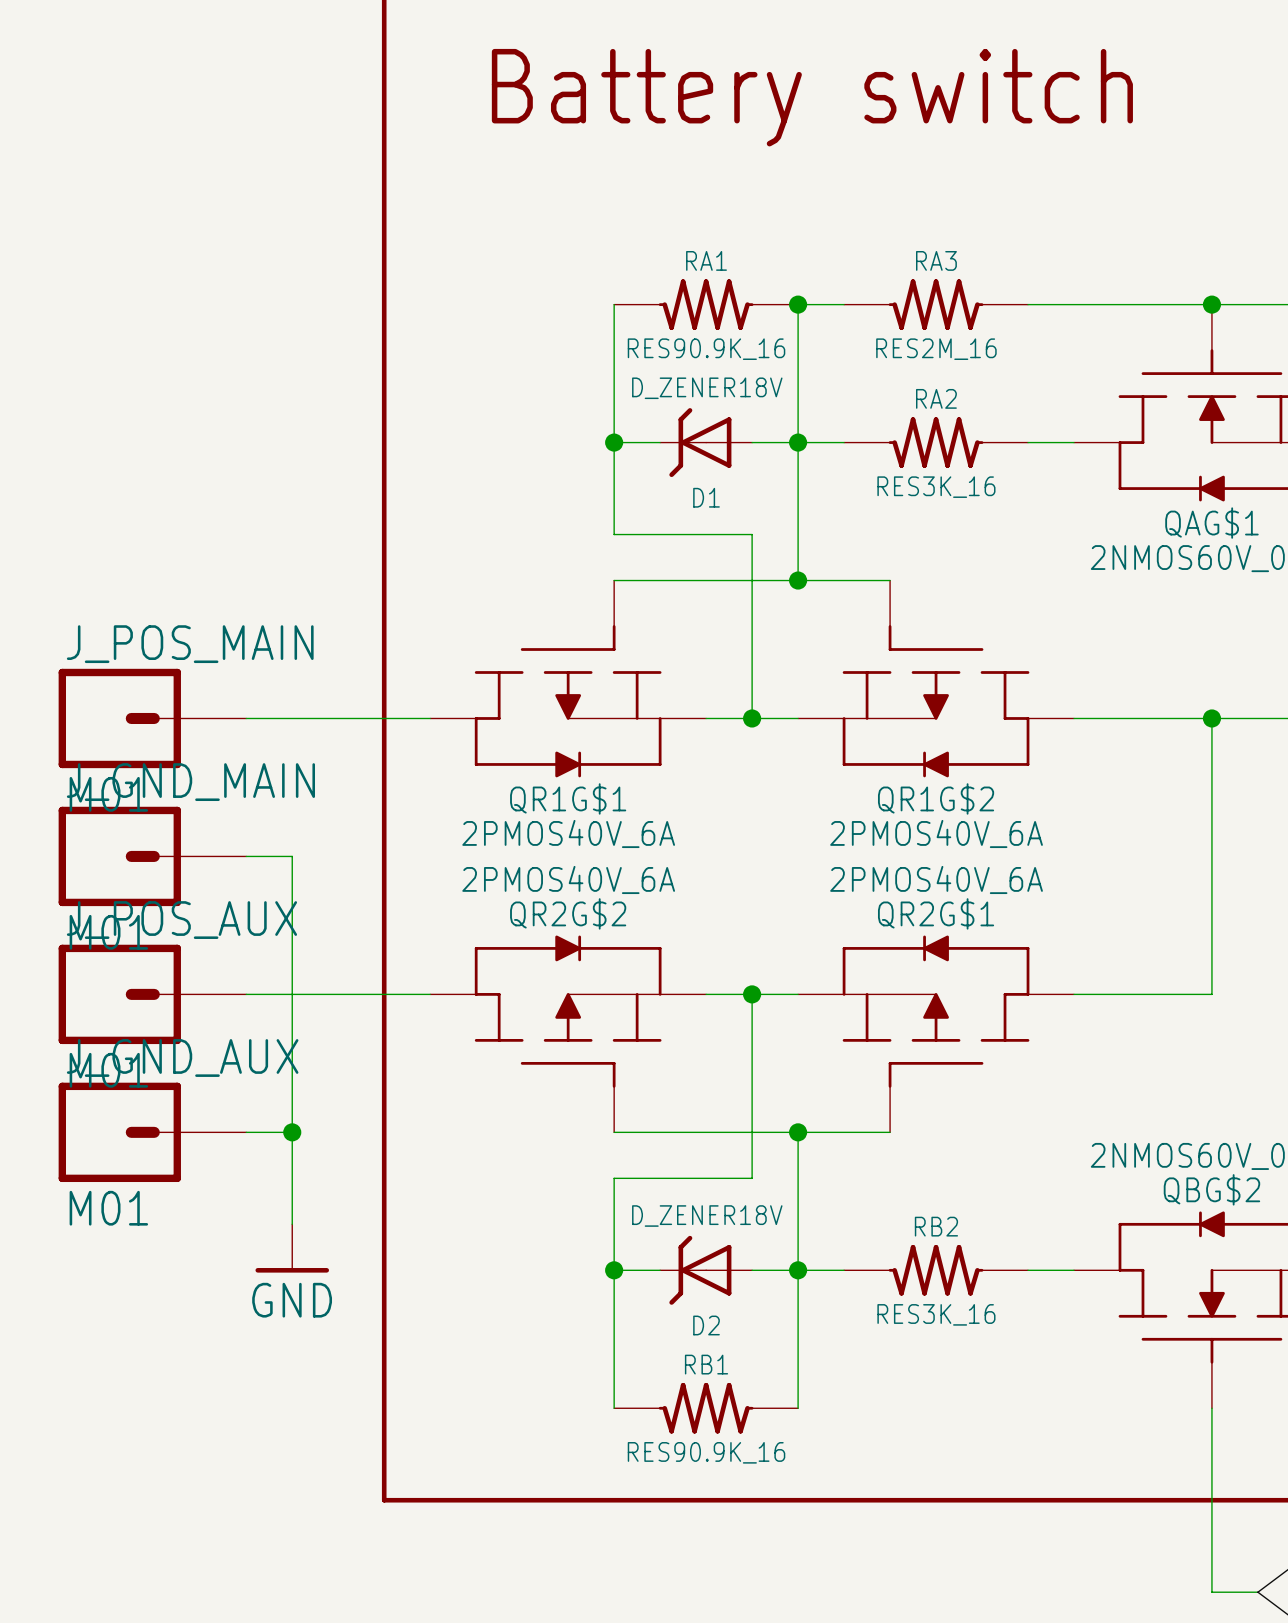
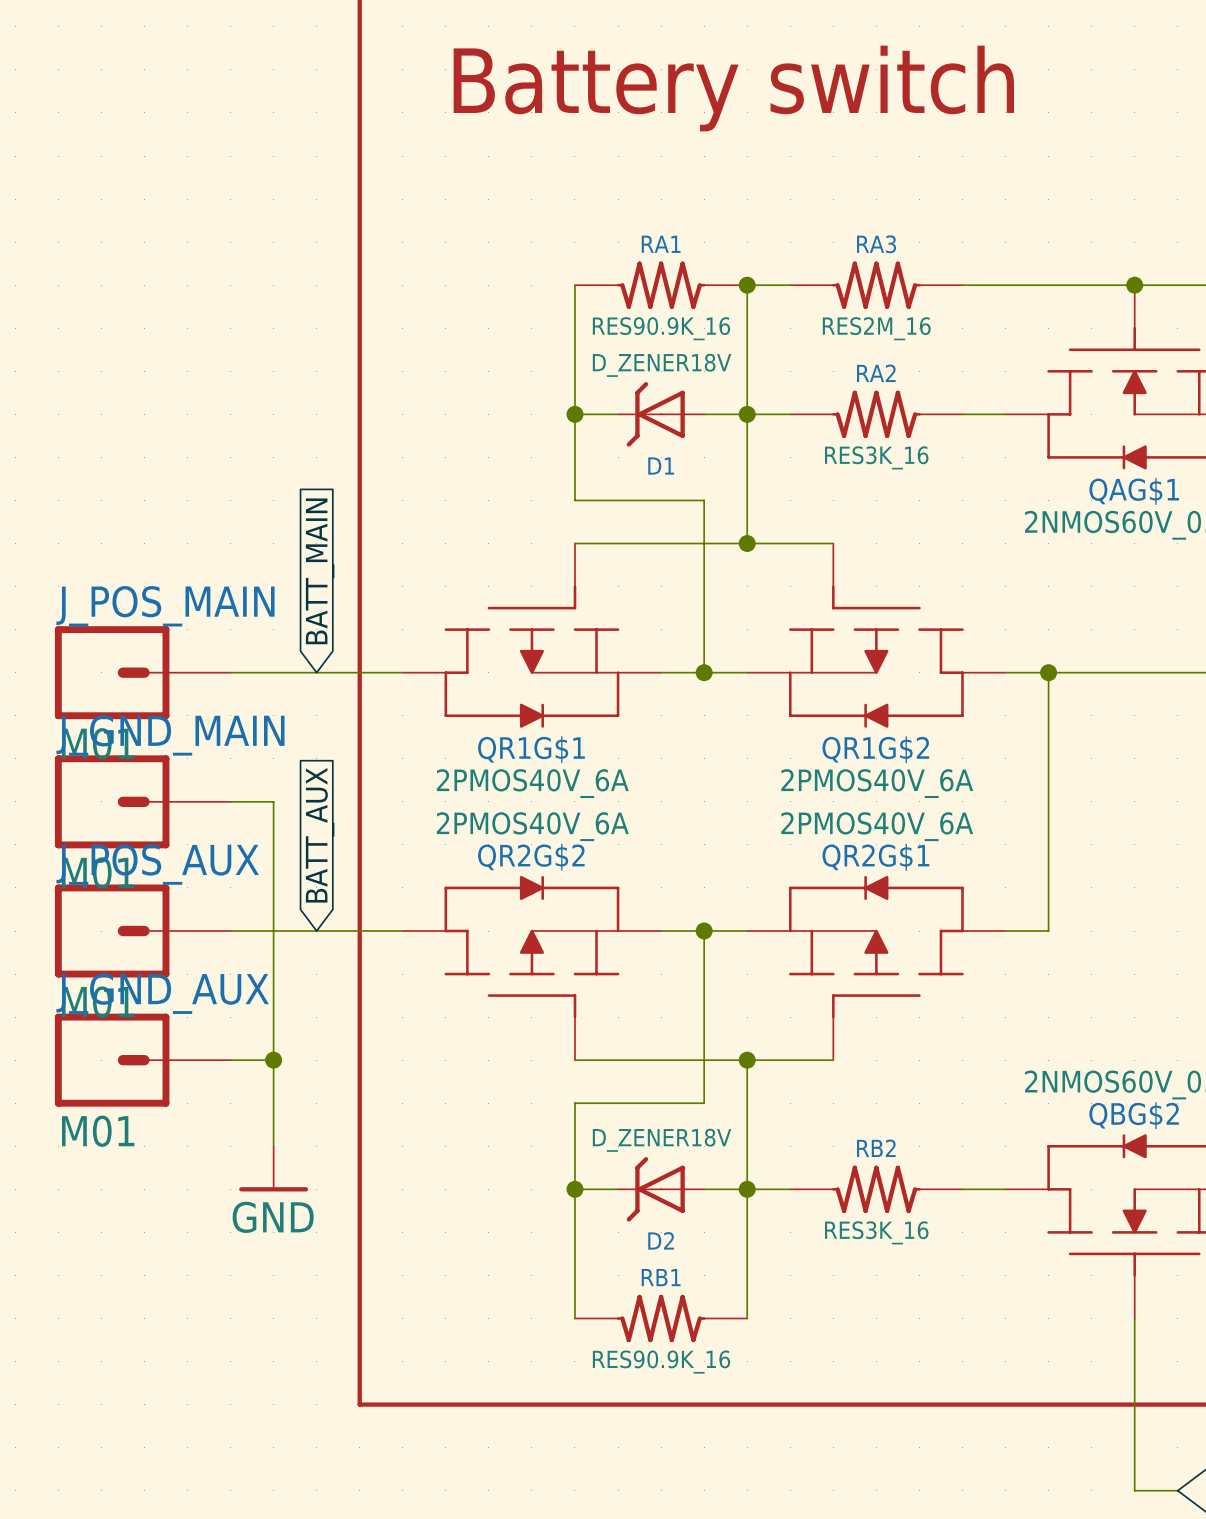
global label: none -> BATT_MAIN (320, 571)
wire: (1211, 718) (1211, 994) (1119, 994) -> (1048, 672) (1048, 931)
junction position: (1211, 718) -> (1048, 672)
global label: none -> BATT_AUX (320, 835)

